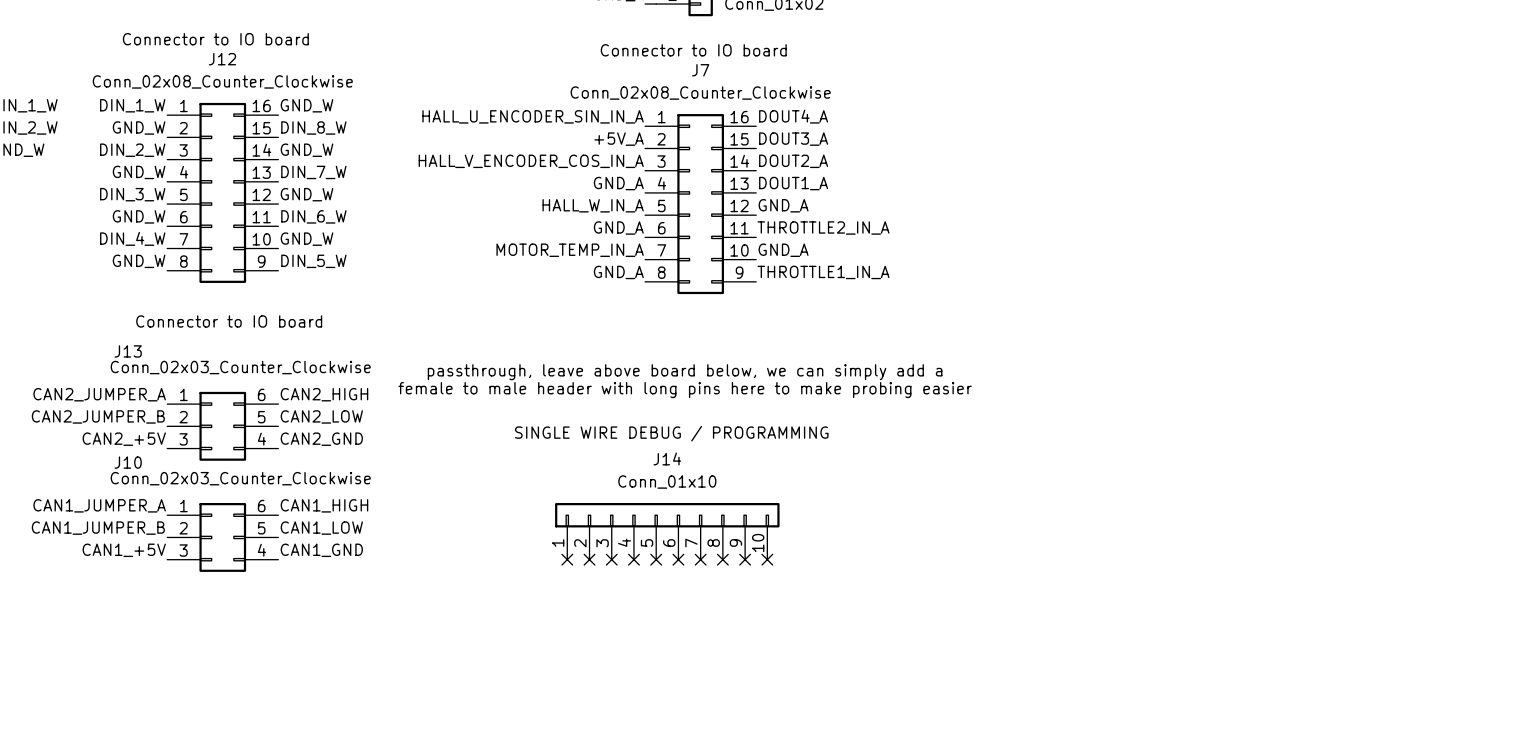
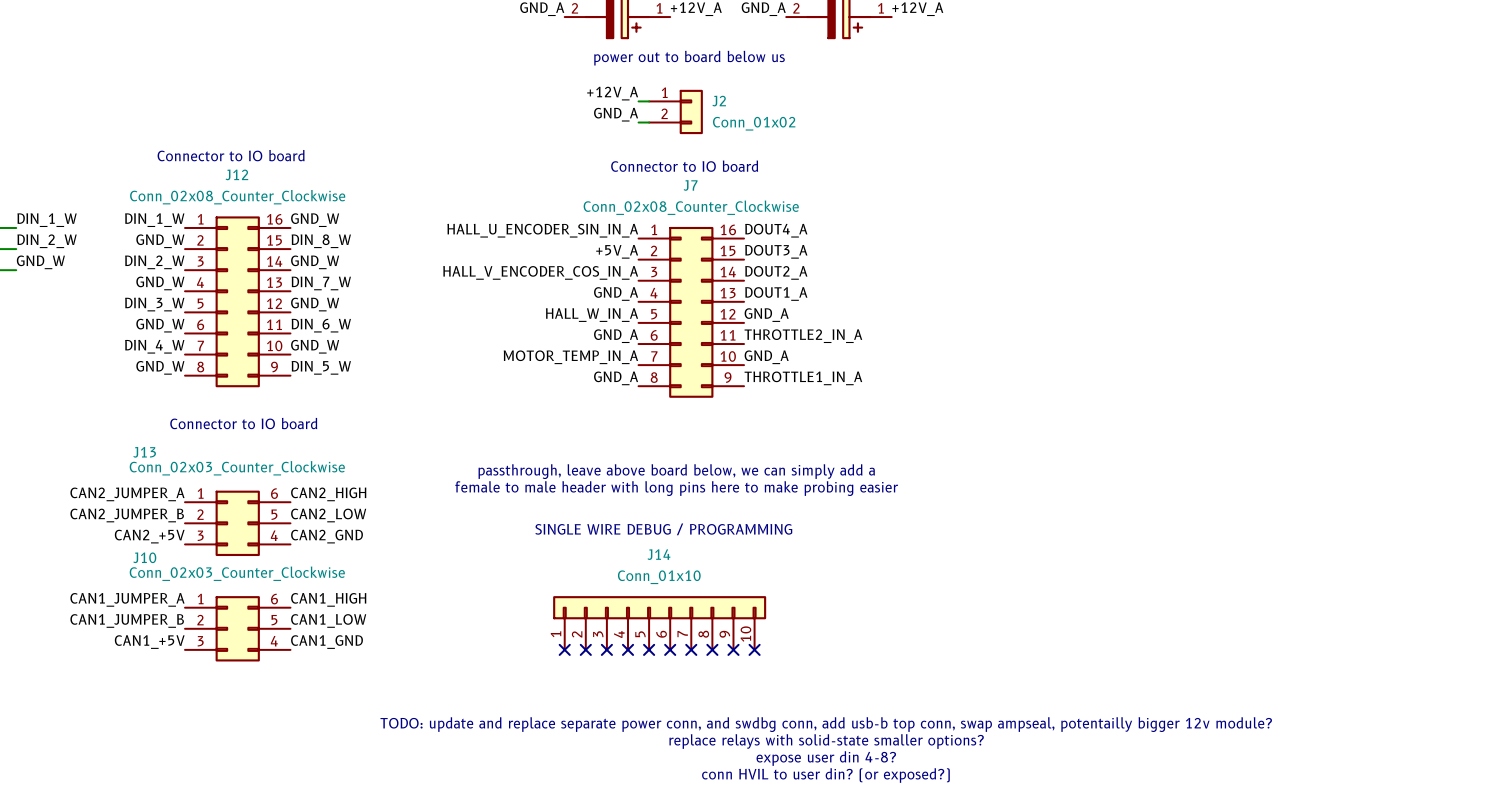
text: none -> TODO: update and replace separate power conn, and swdbg conn, add usb-b top conn, swap ampseal, potentailly bigger 12v module? (826, 724)
text: none -> replace relays with solid-state smaller options? (826, 741)
text: none -> expose user din 4-8? (826, 758)
text: none -> conn HVIL to user din? (or exposed?) (825, 775)

